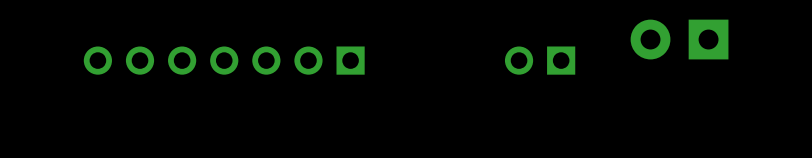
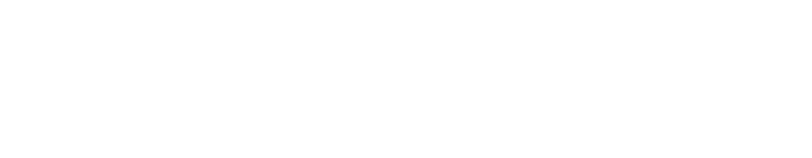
part: (679, 39) -> none
part: (224, 60) -> none
part: (540, 60) -> none

